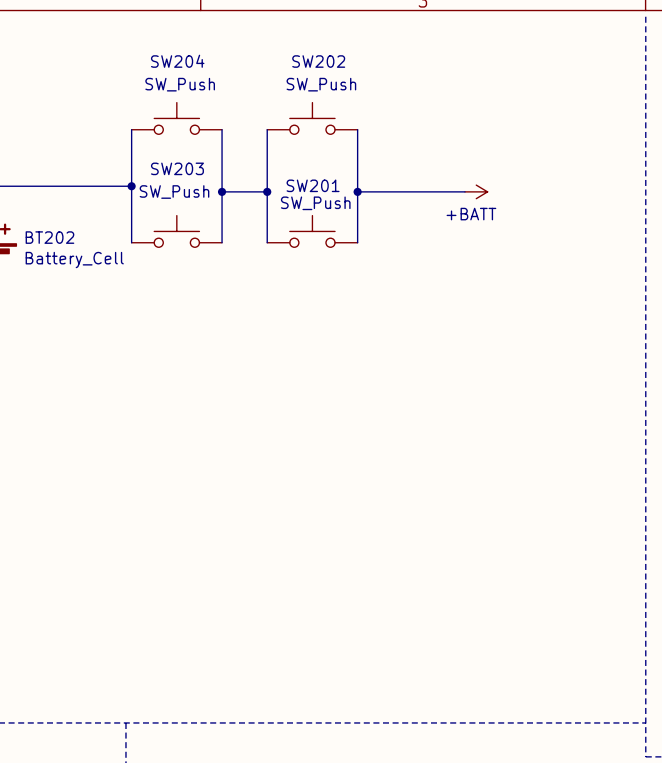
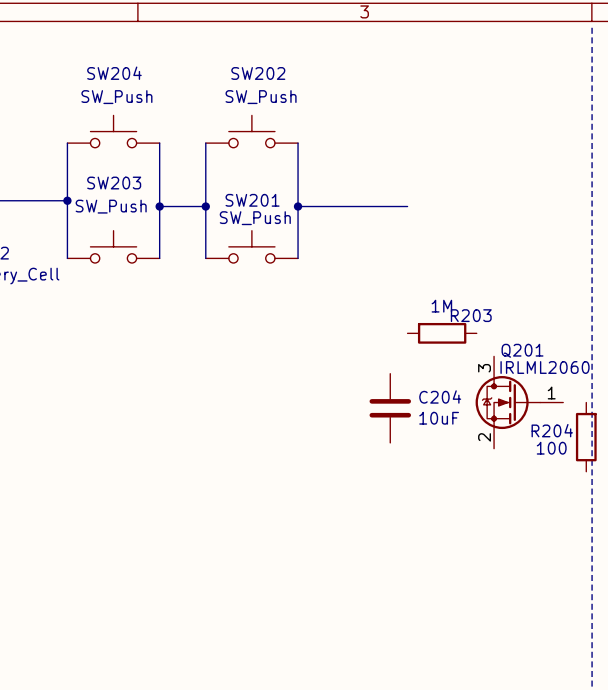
power symbol: +BATT (476, 191) -> none
R203: none -> 1M (442, 333)
Q201: none -> IRLML2060 (519, 402)
C204: none -> 10uF (390, 408)
R204: none -> 100 (586, 437)

